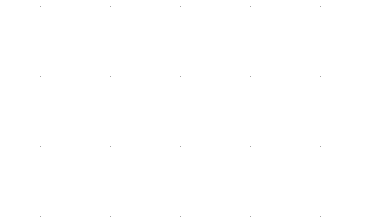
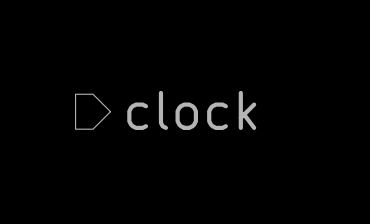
hierarchical label: none -> clock (191, 110)

